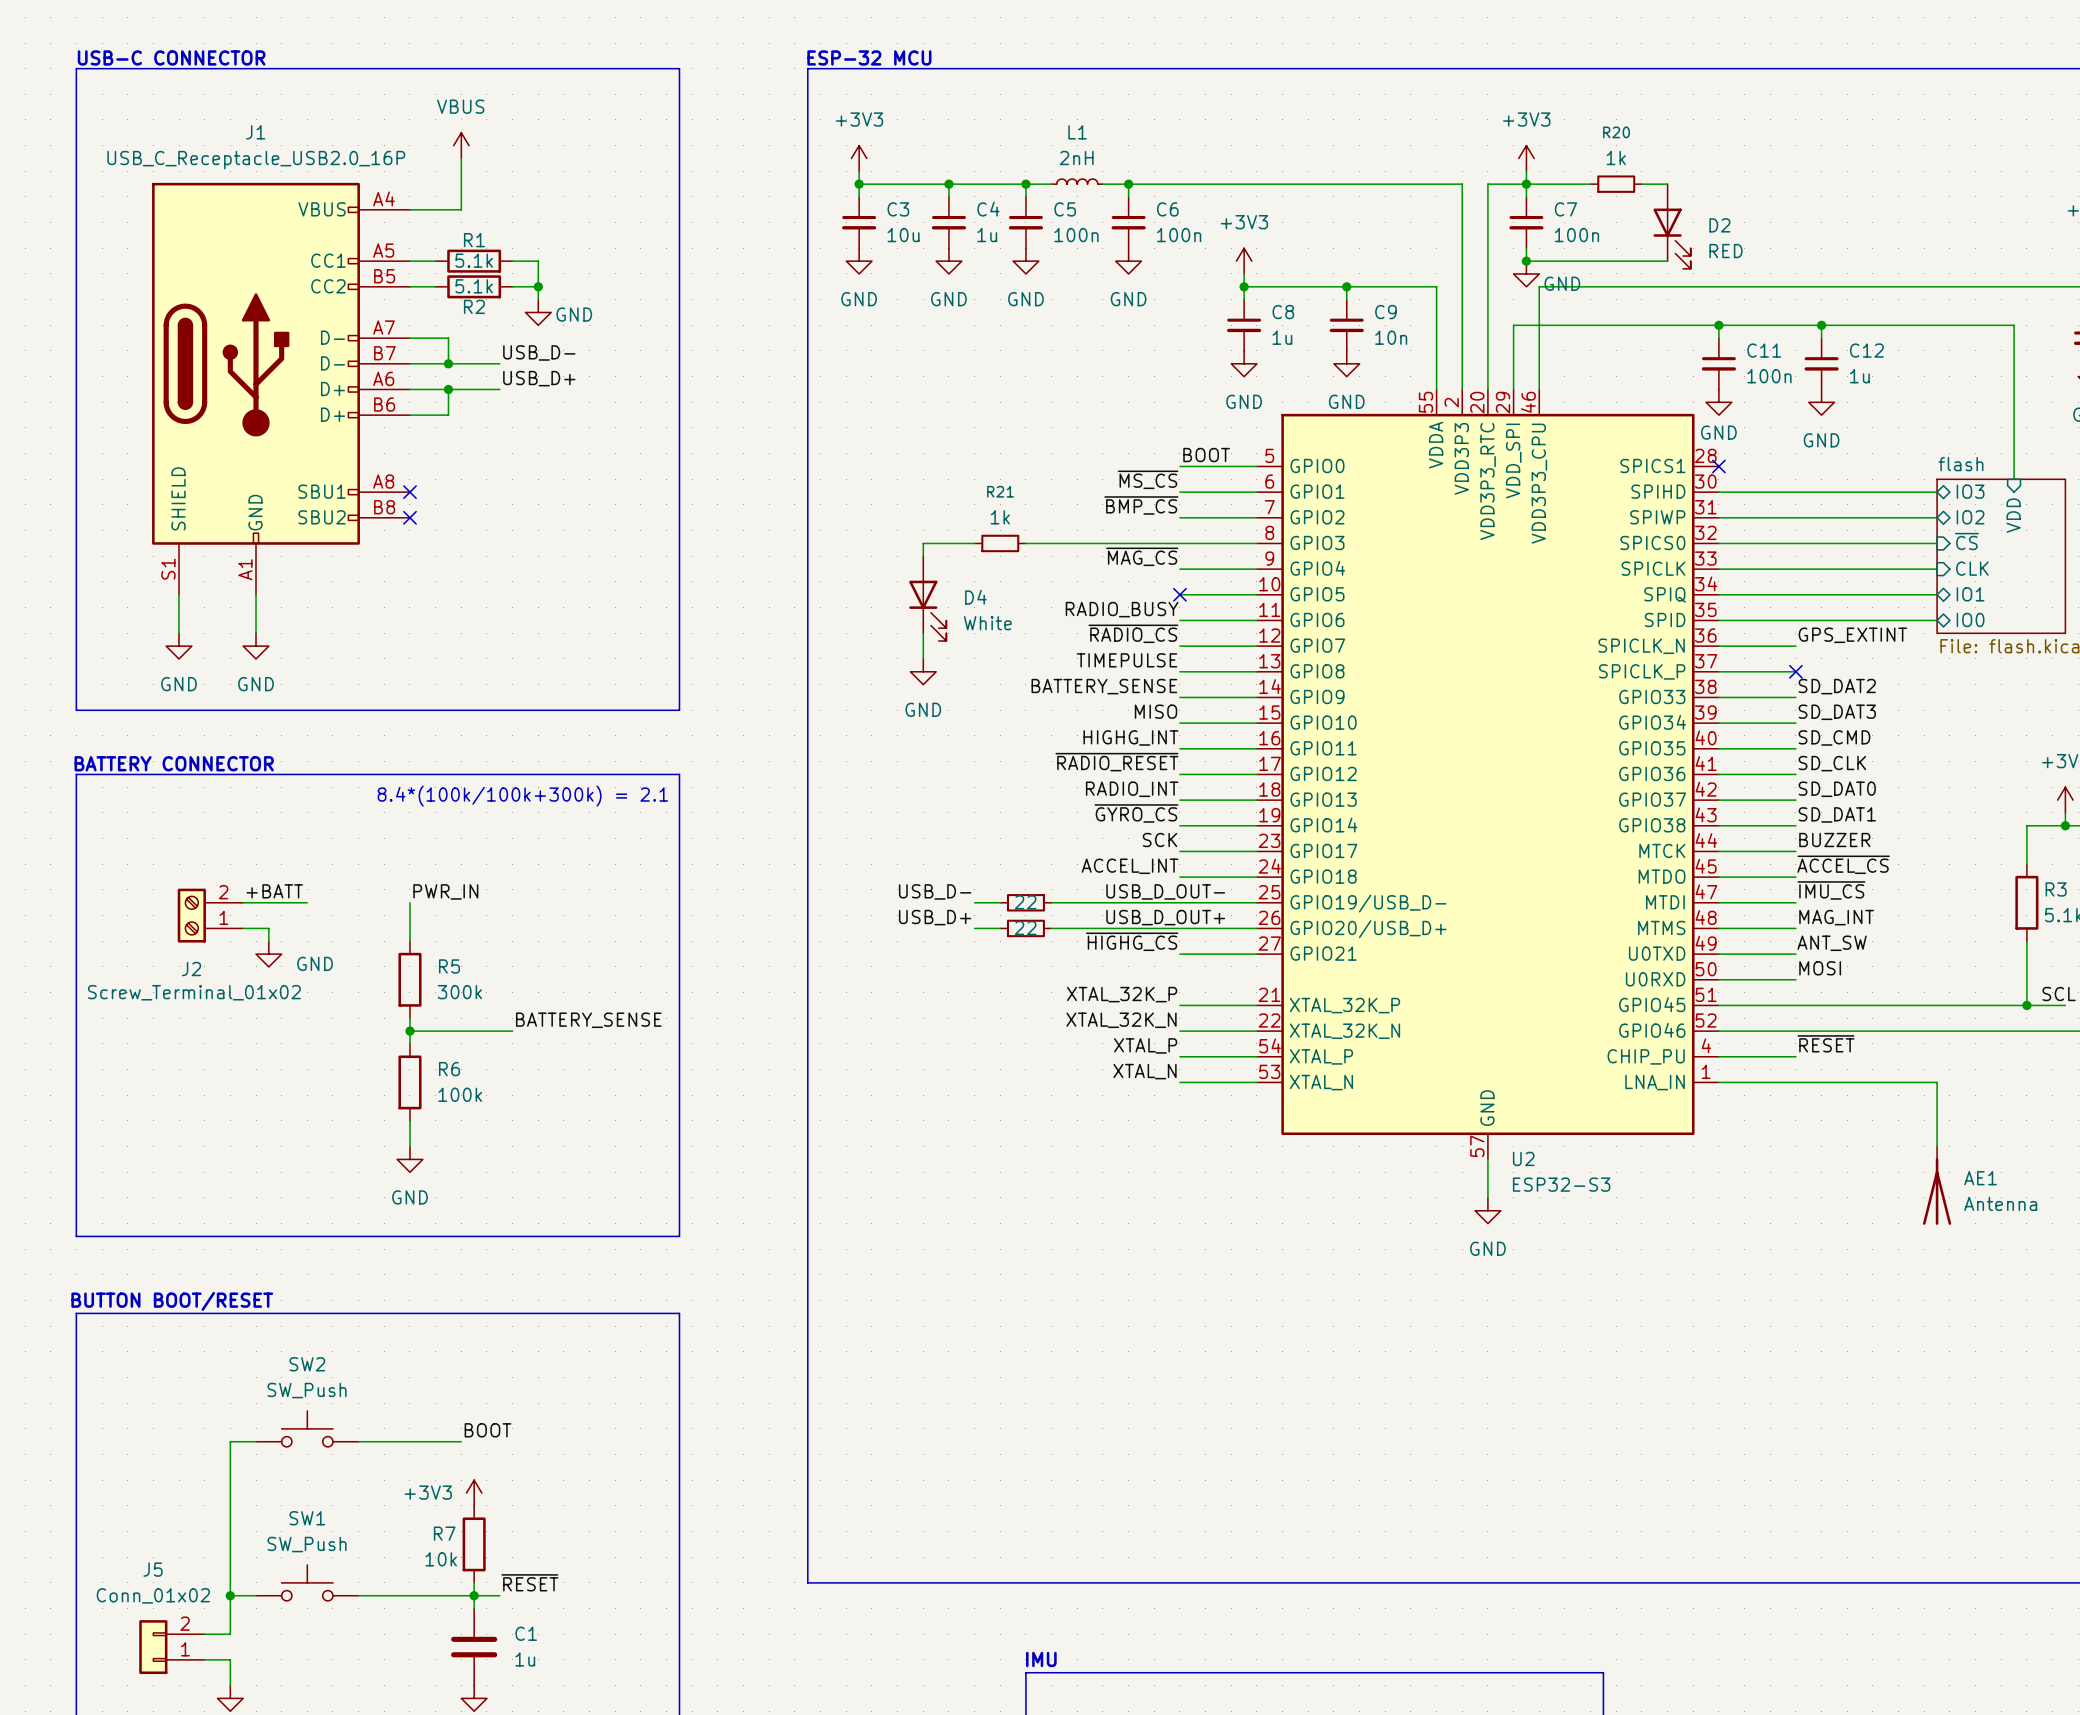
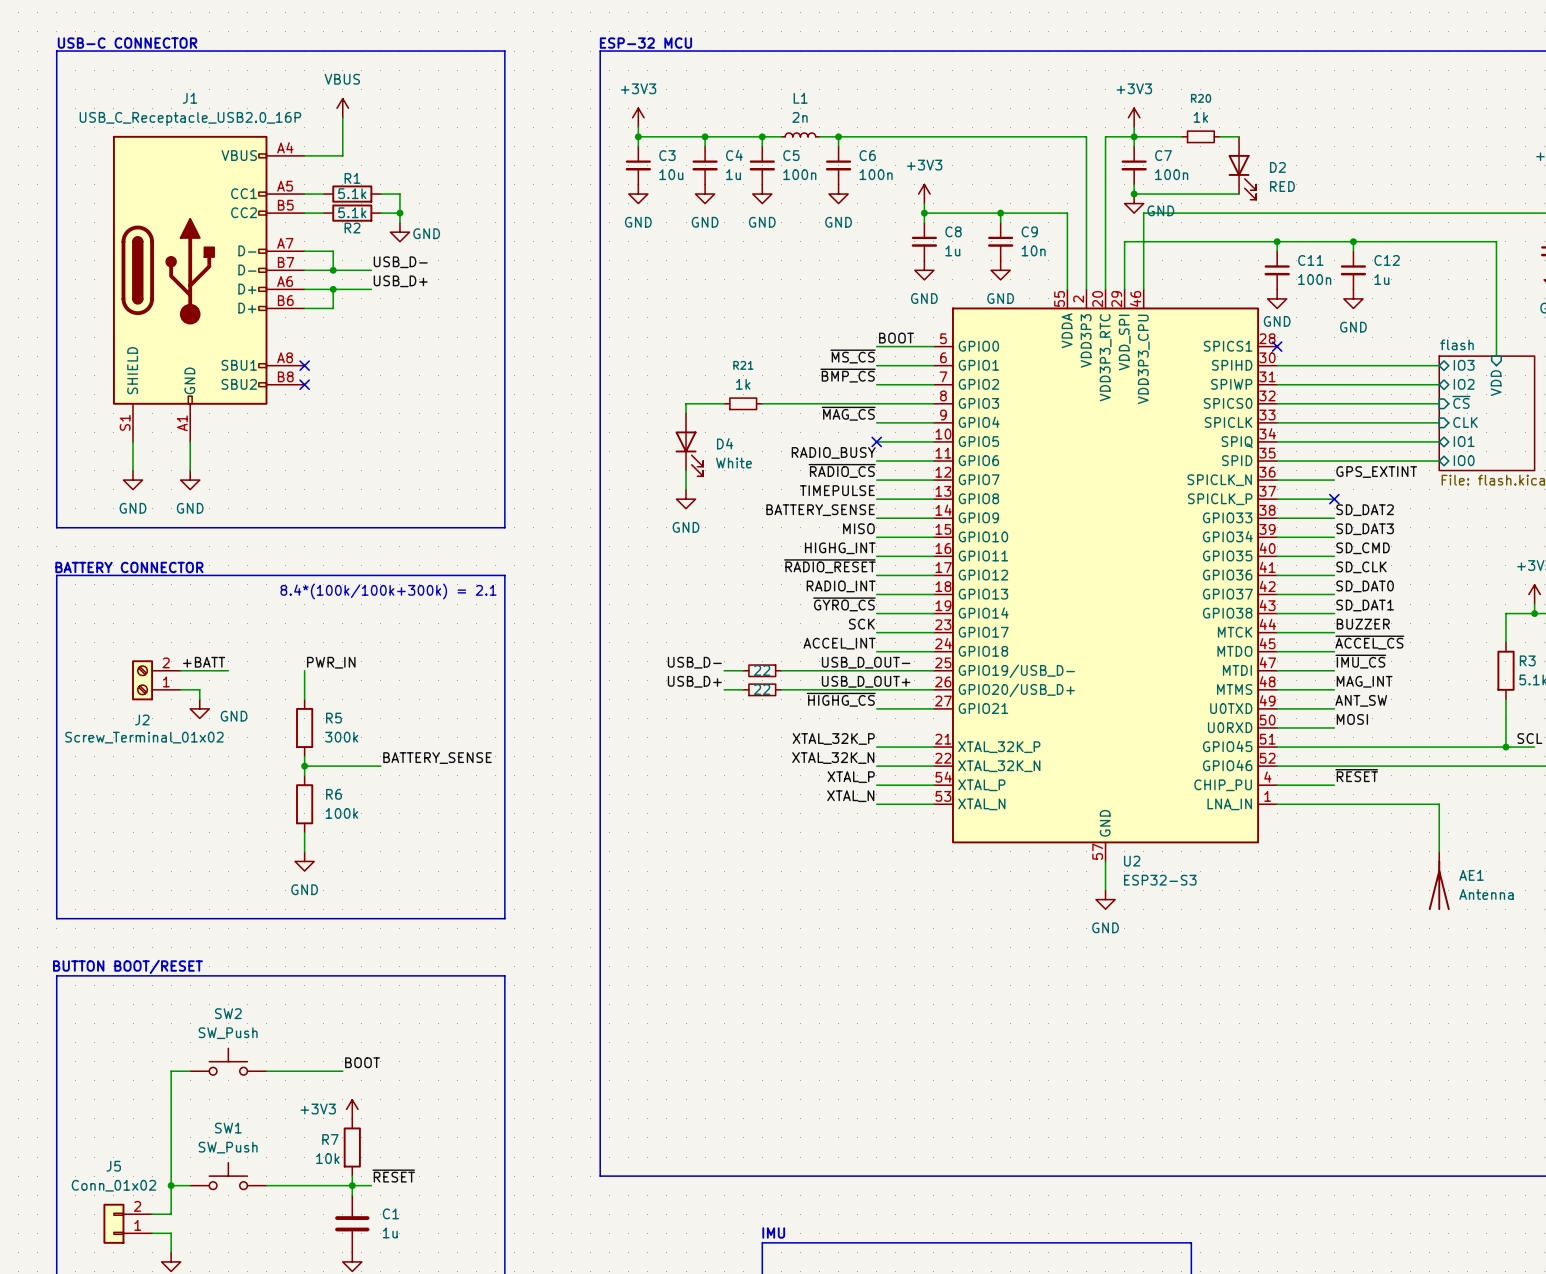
L1 value: 2nH (1076, 158) -> 2n (799, 117)

